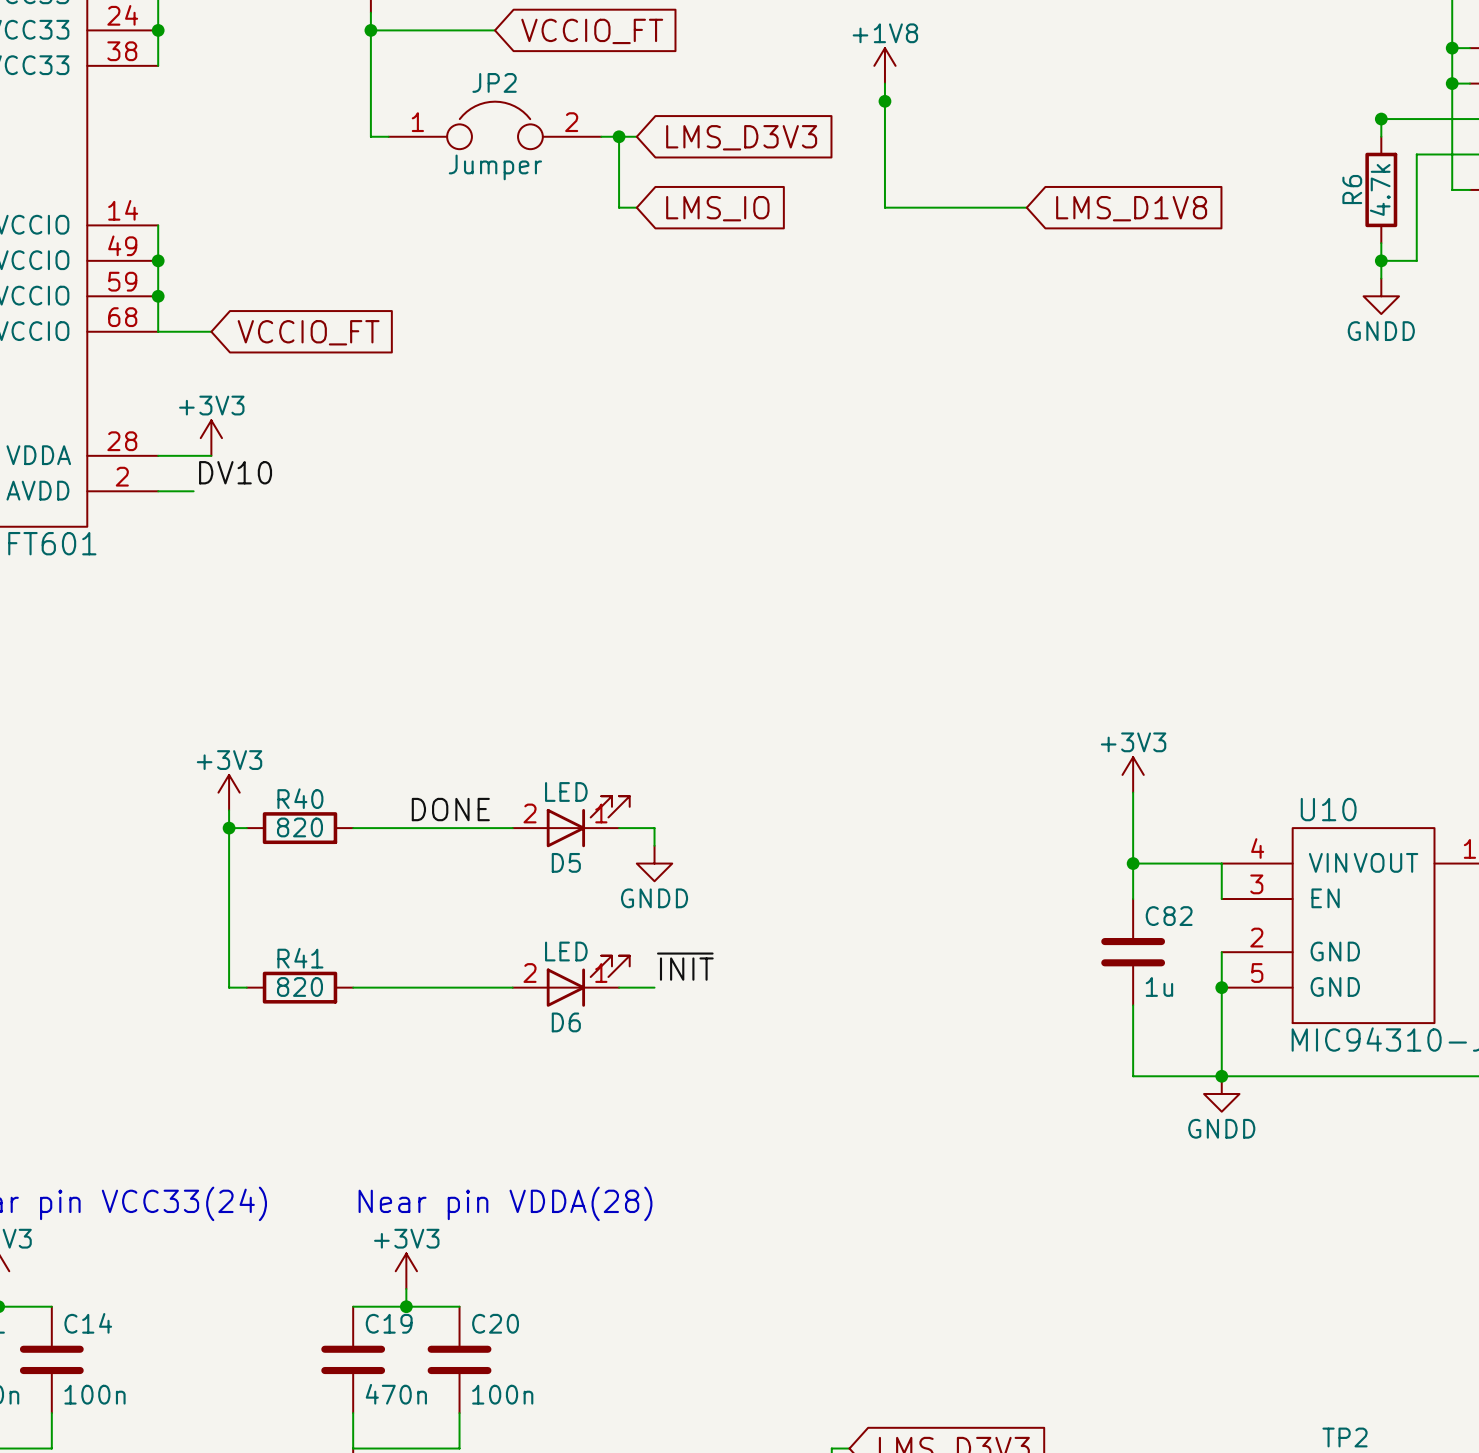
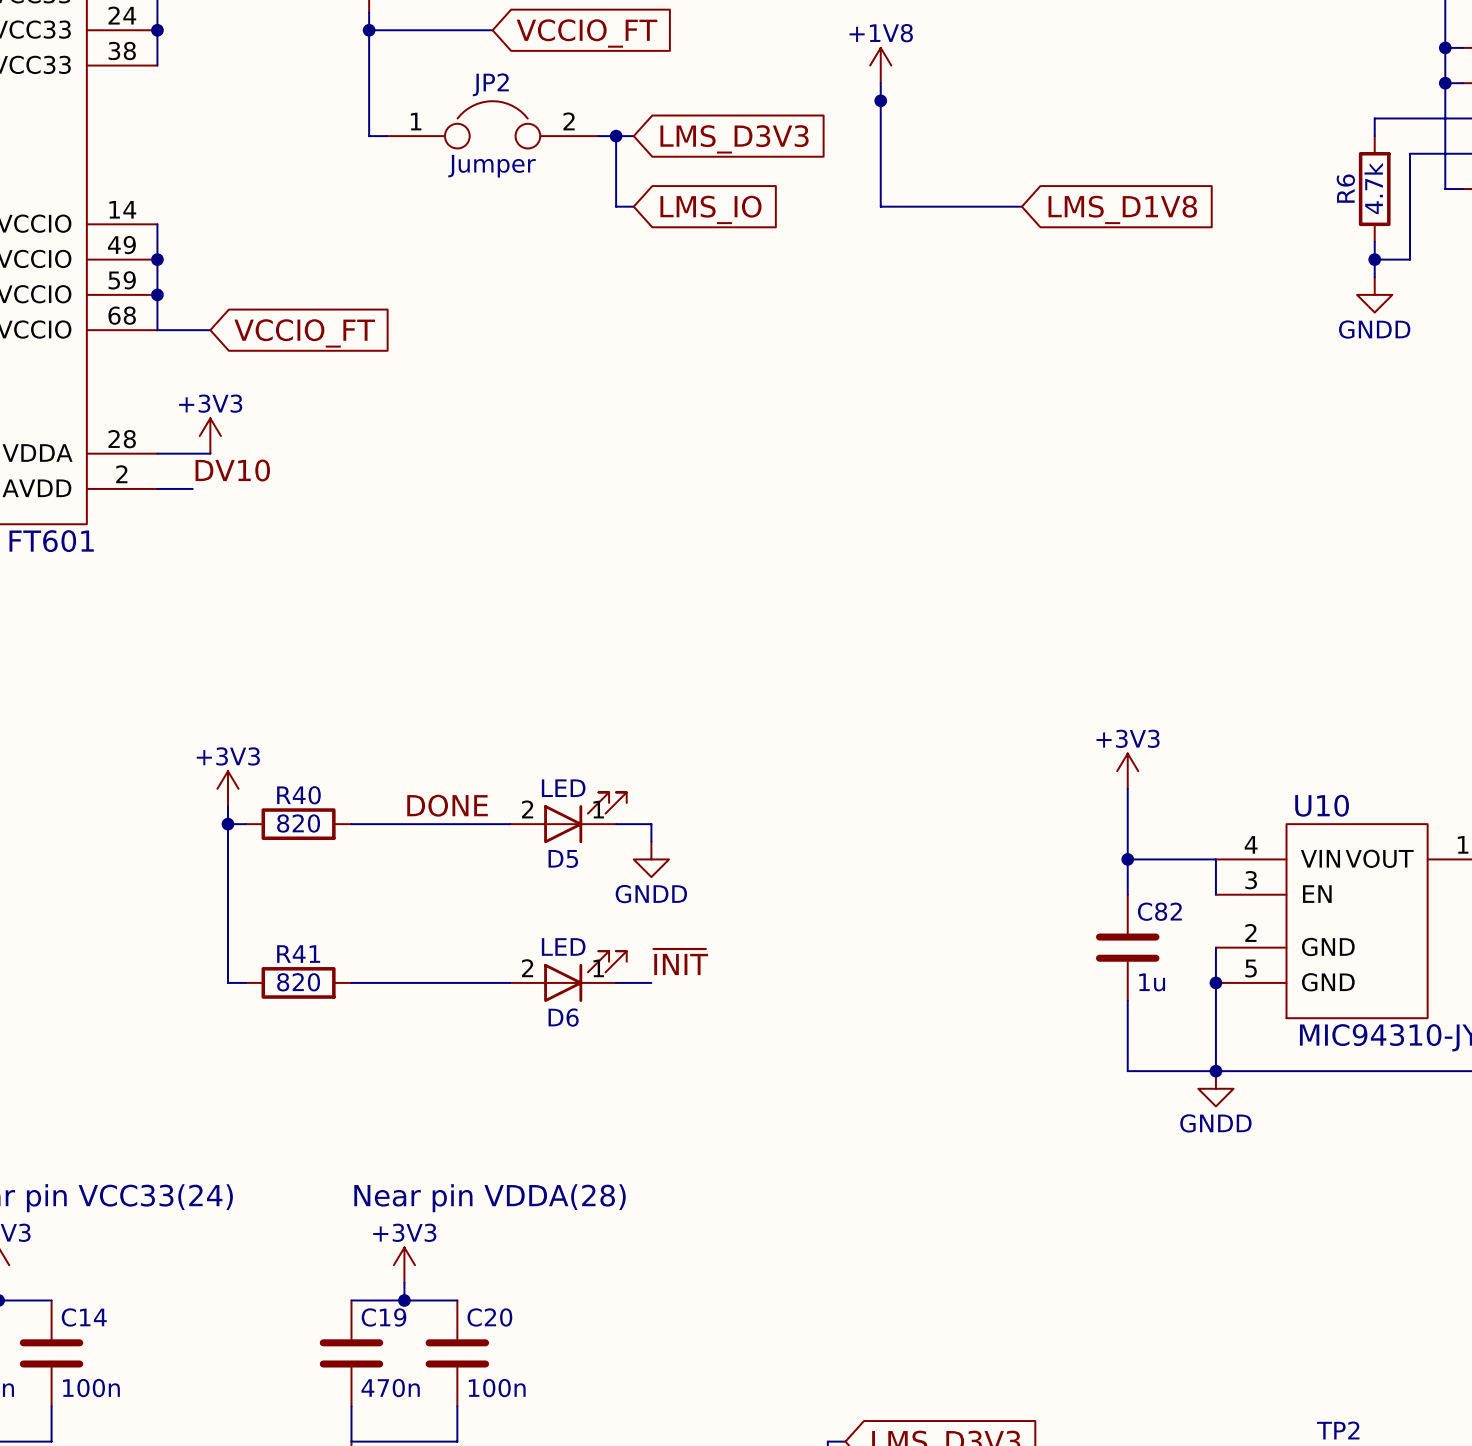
junction: (1381, 119) -> none

